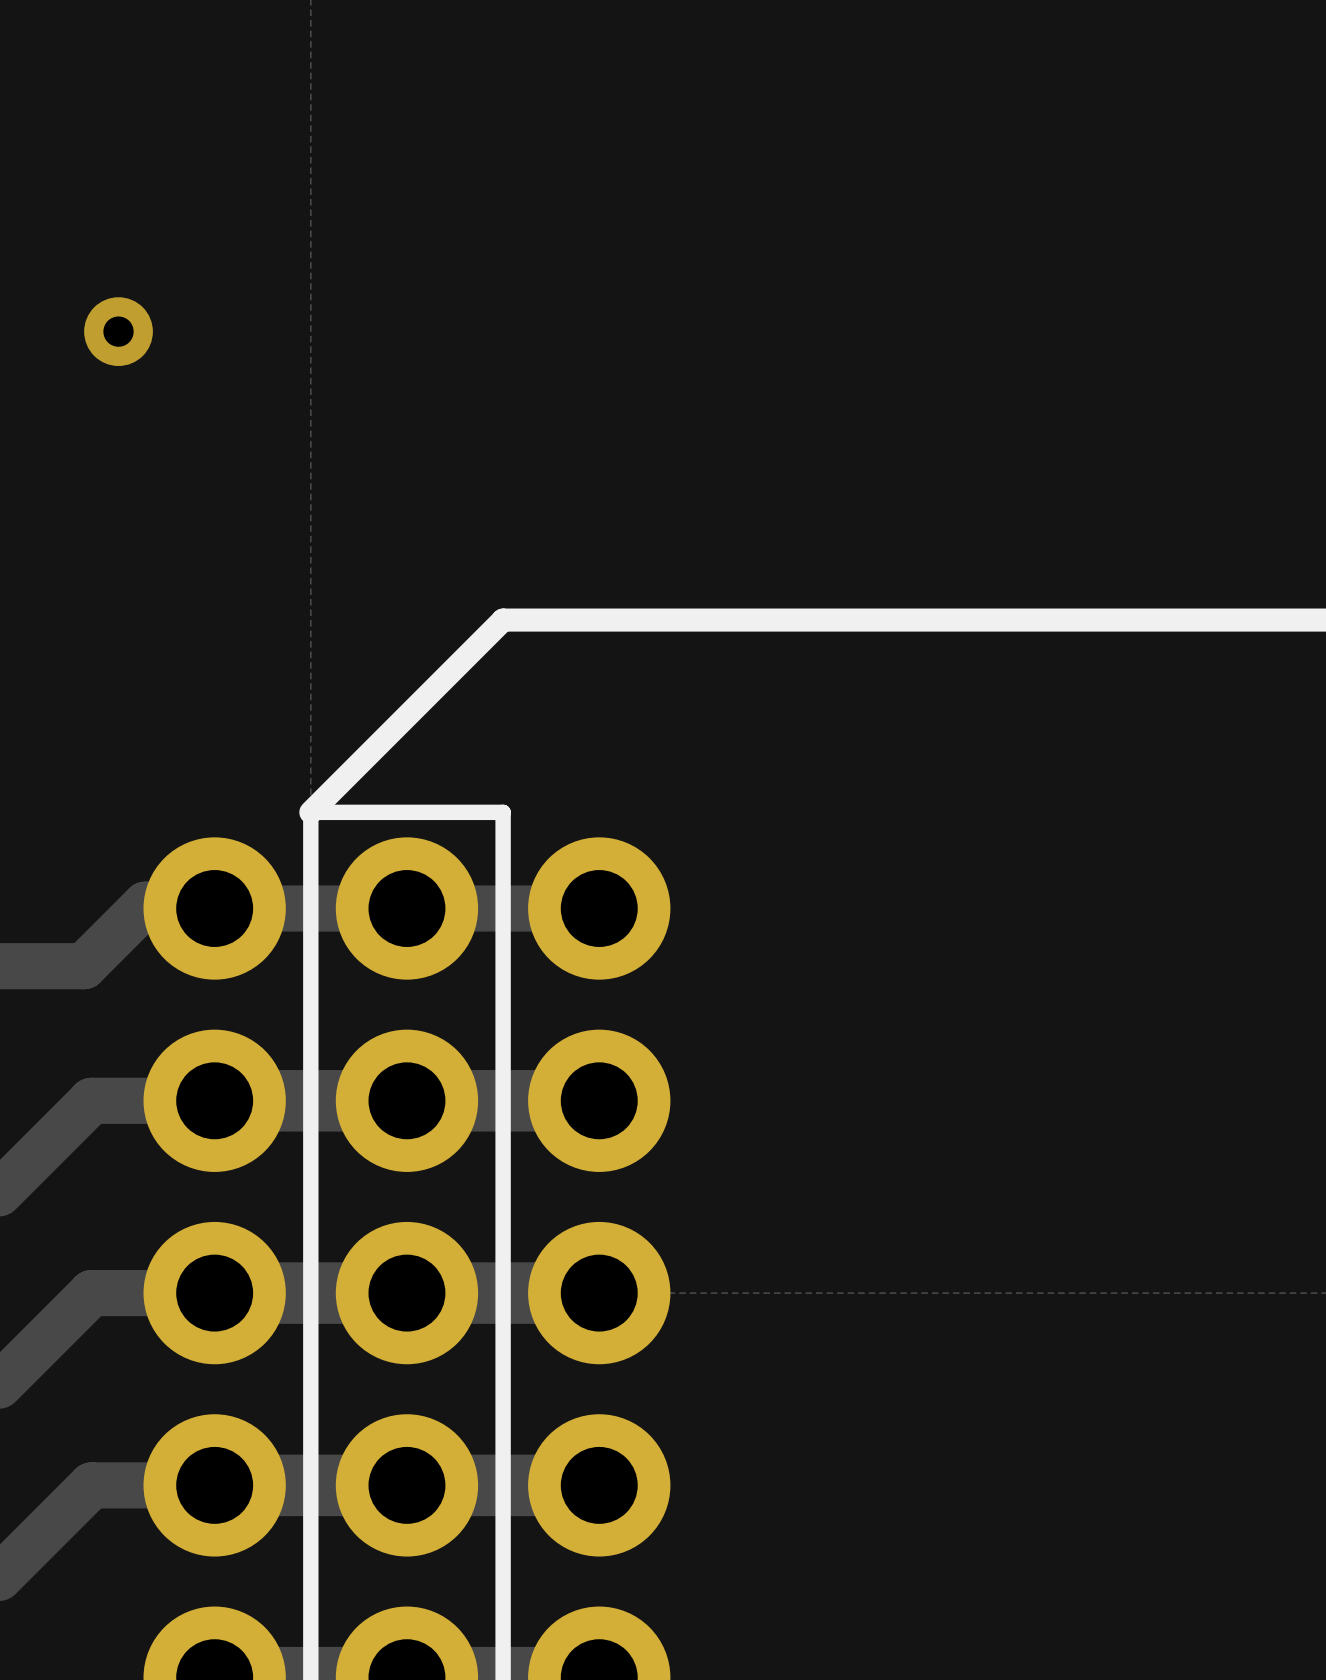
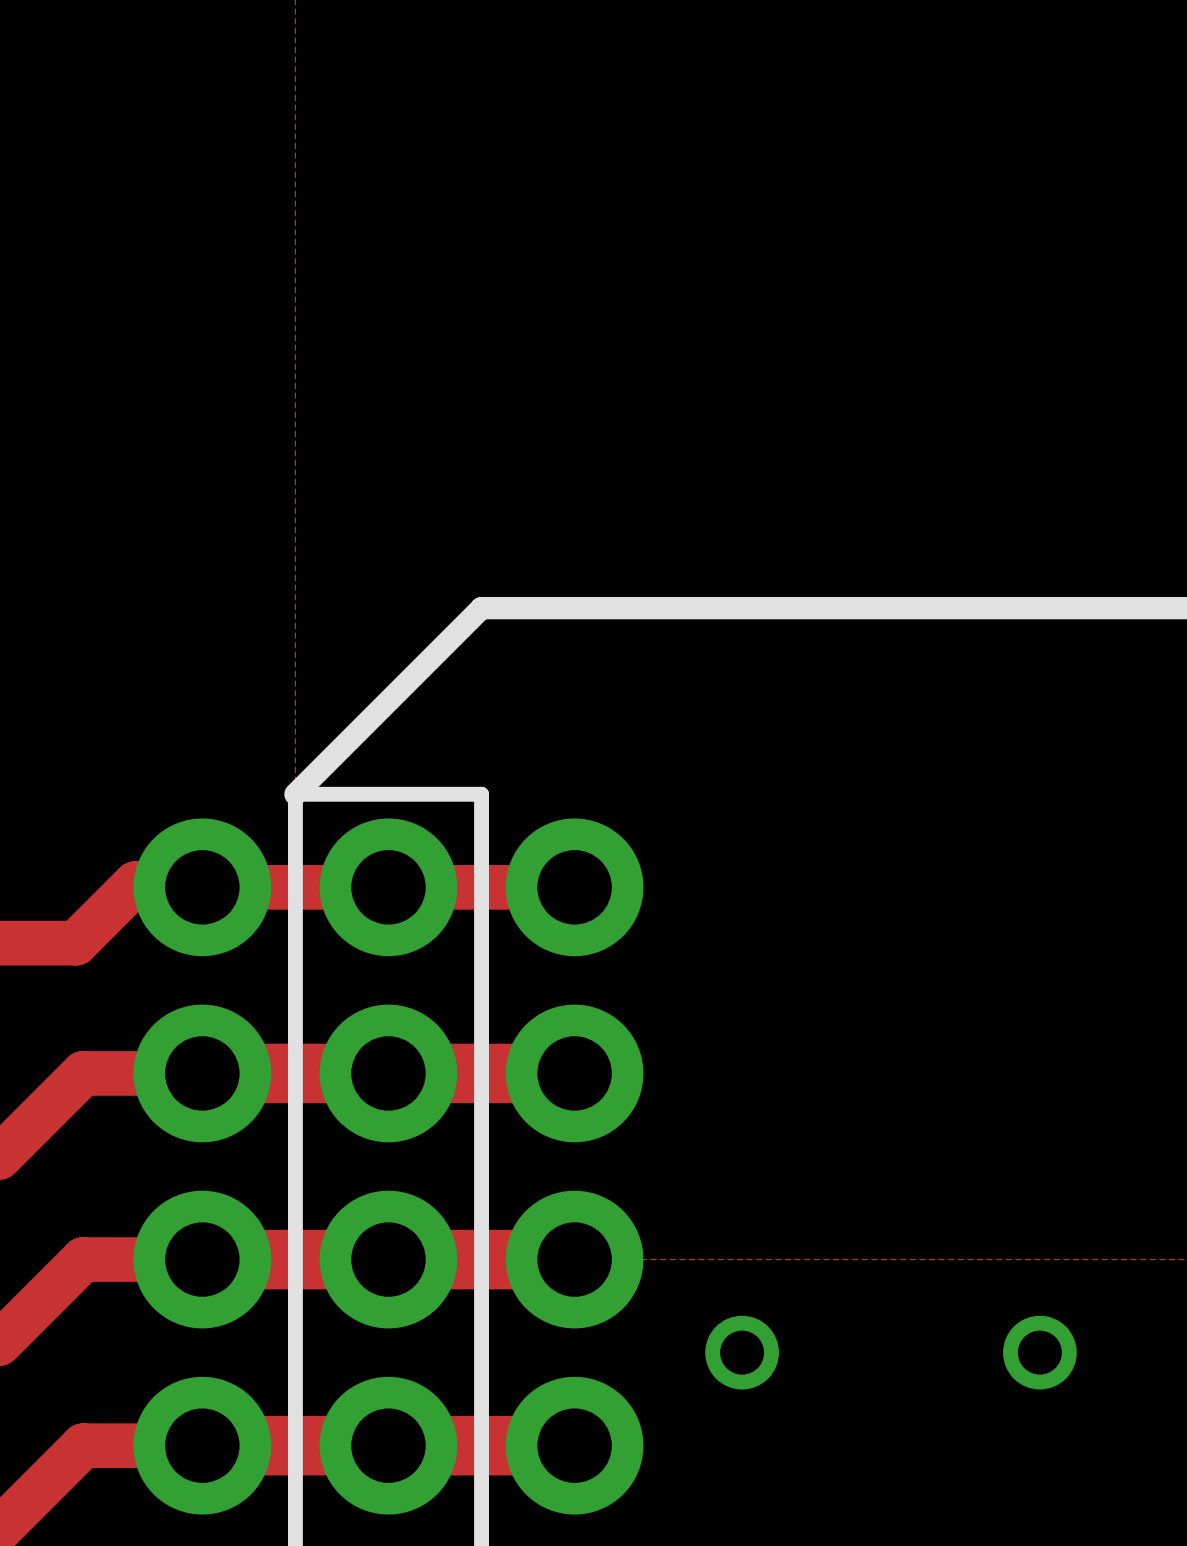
via: (118, 331) -> none
via: none -> (742, 1352)
via: none -> (1039, 1352)

